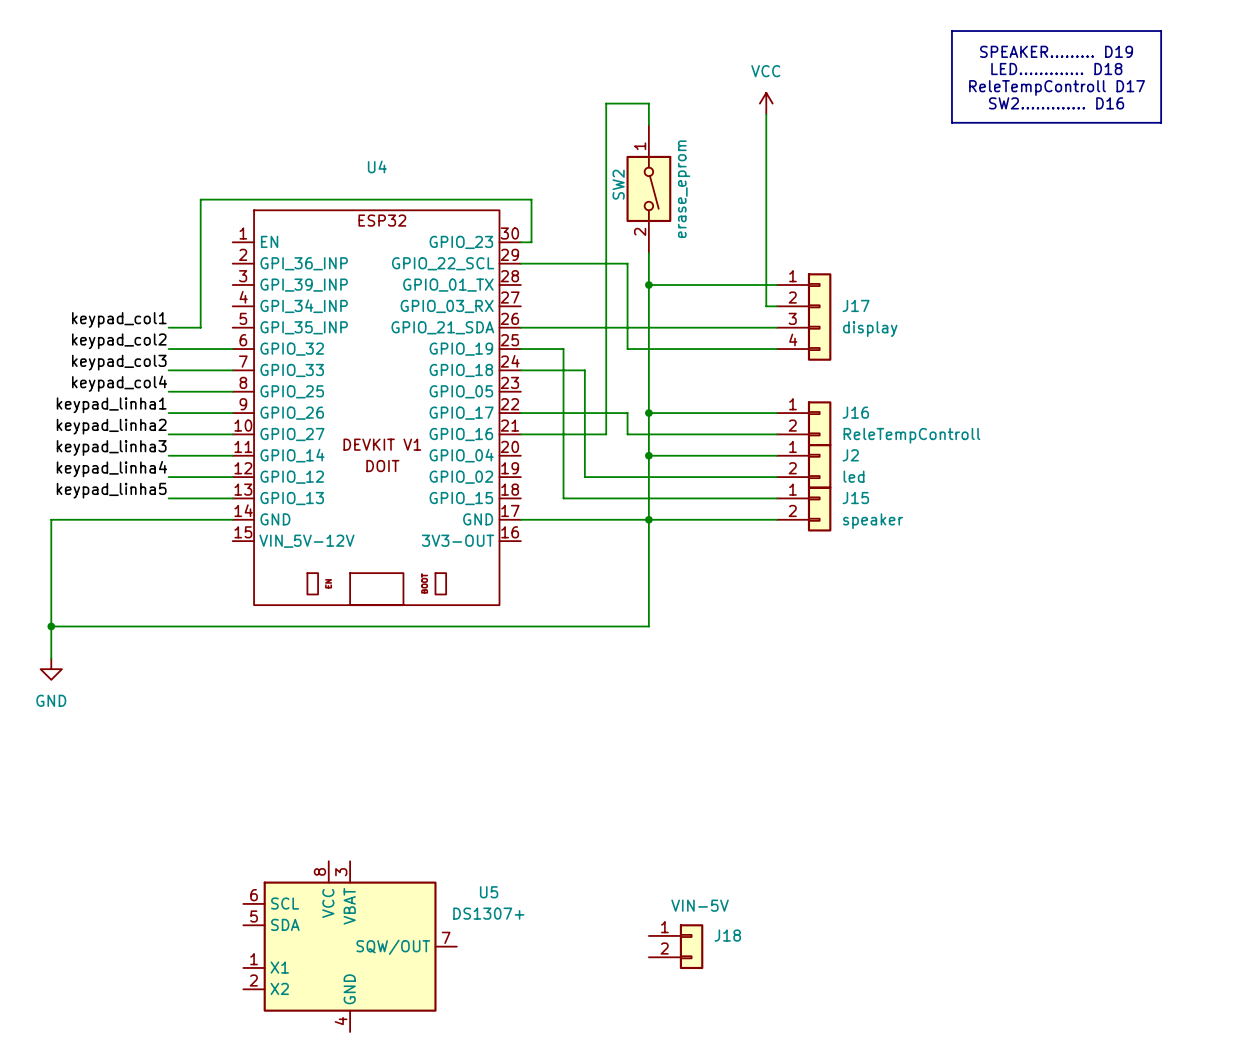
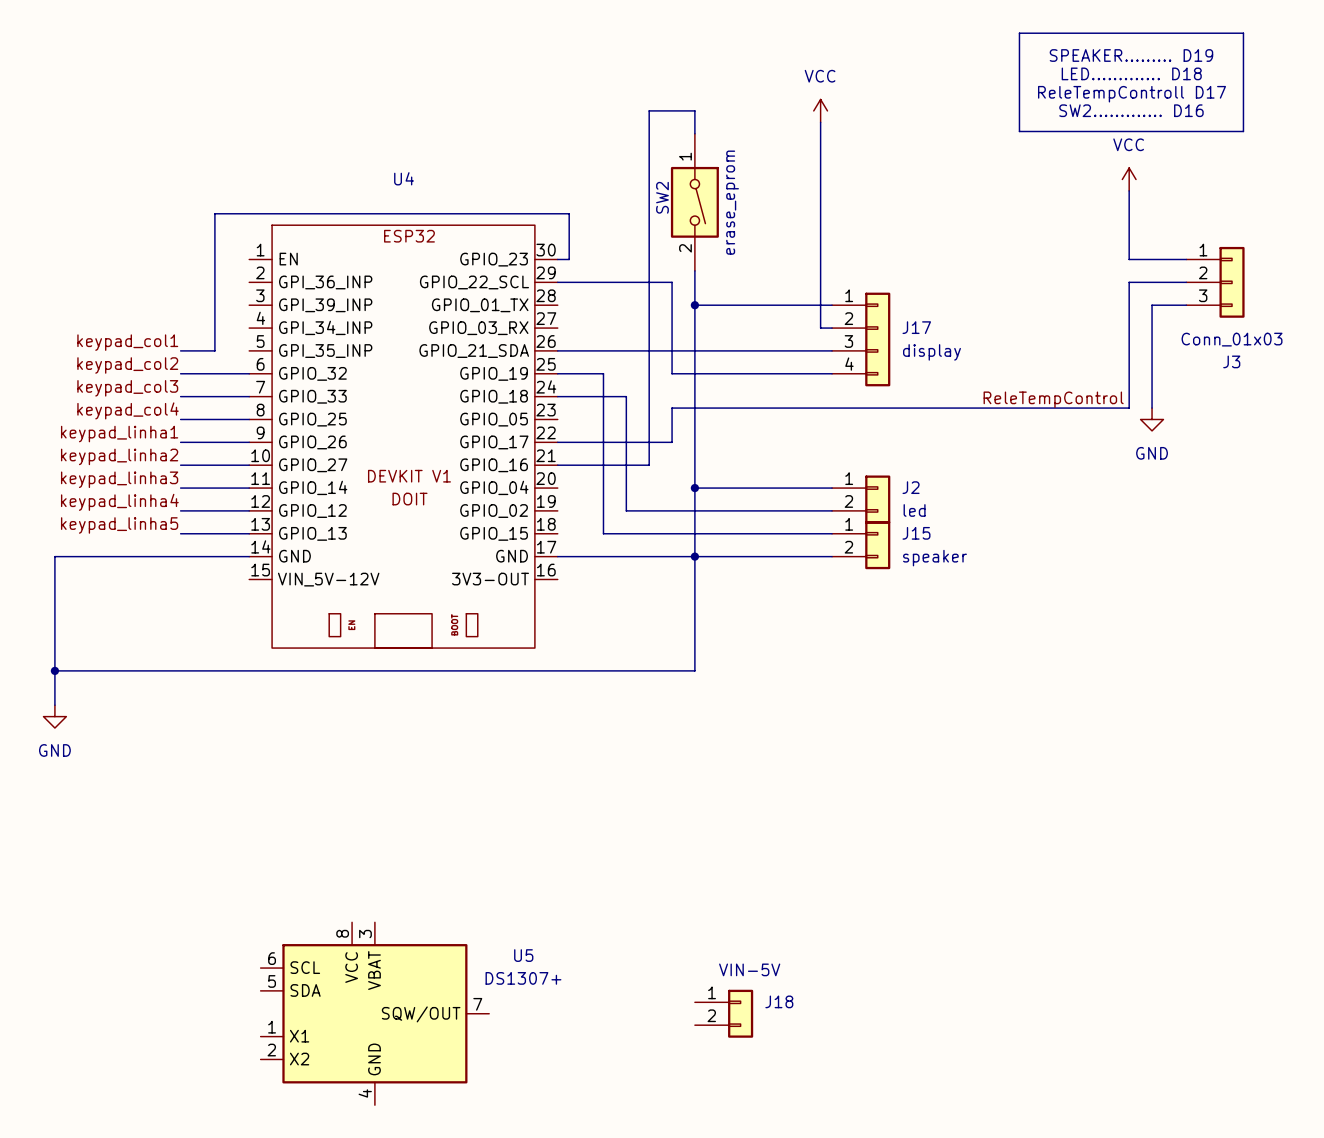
power symbol: none -> VCC (1129, 179)
wire: none -> (1129, 190) (1129, 259) (1186, 259)
J3: none -> Conn_01x03 (1215, 282)
wire: none -> (1186, 305) (1152, 305) (1152, 408)
label: none -> ReleTempControl (1053, 399)
power symbol: none -> GND (1152, 419)
wire: (627, 413) (627, 434) (776, 434) -> (672, 442) (672, 408) (1129, 408) (1129, 282) (1186, 282)
wire: (648, 413) (776, 413) -> none
junction: (648, 413) -> none
J16: ReleTempControll (804, 423) -> none

